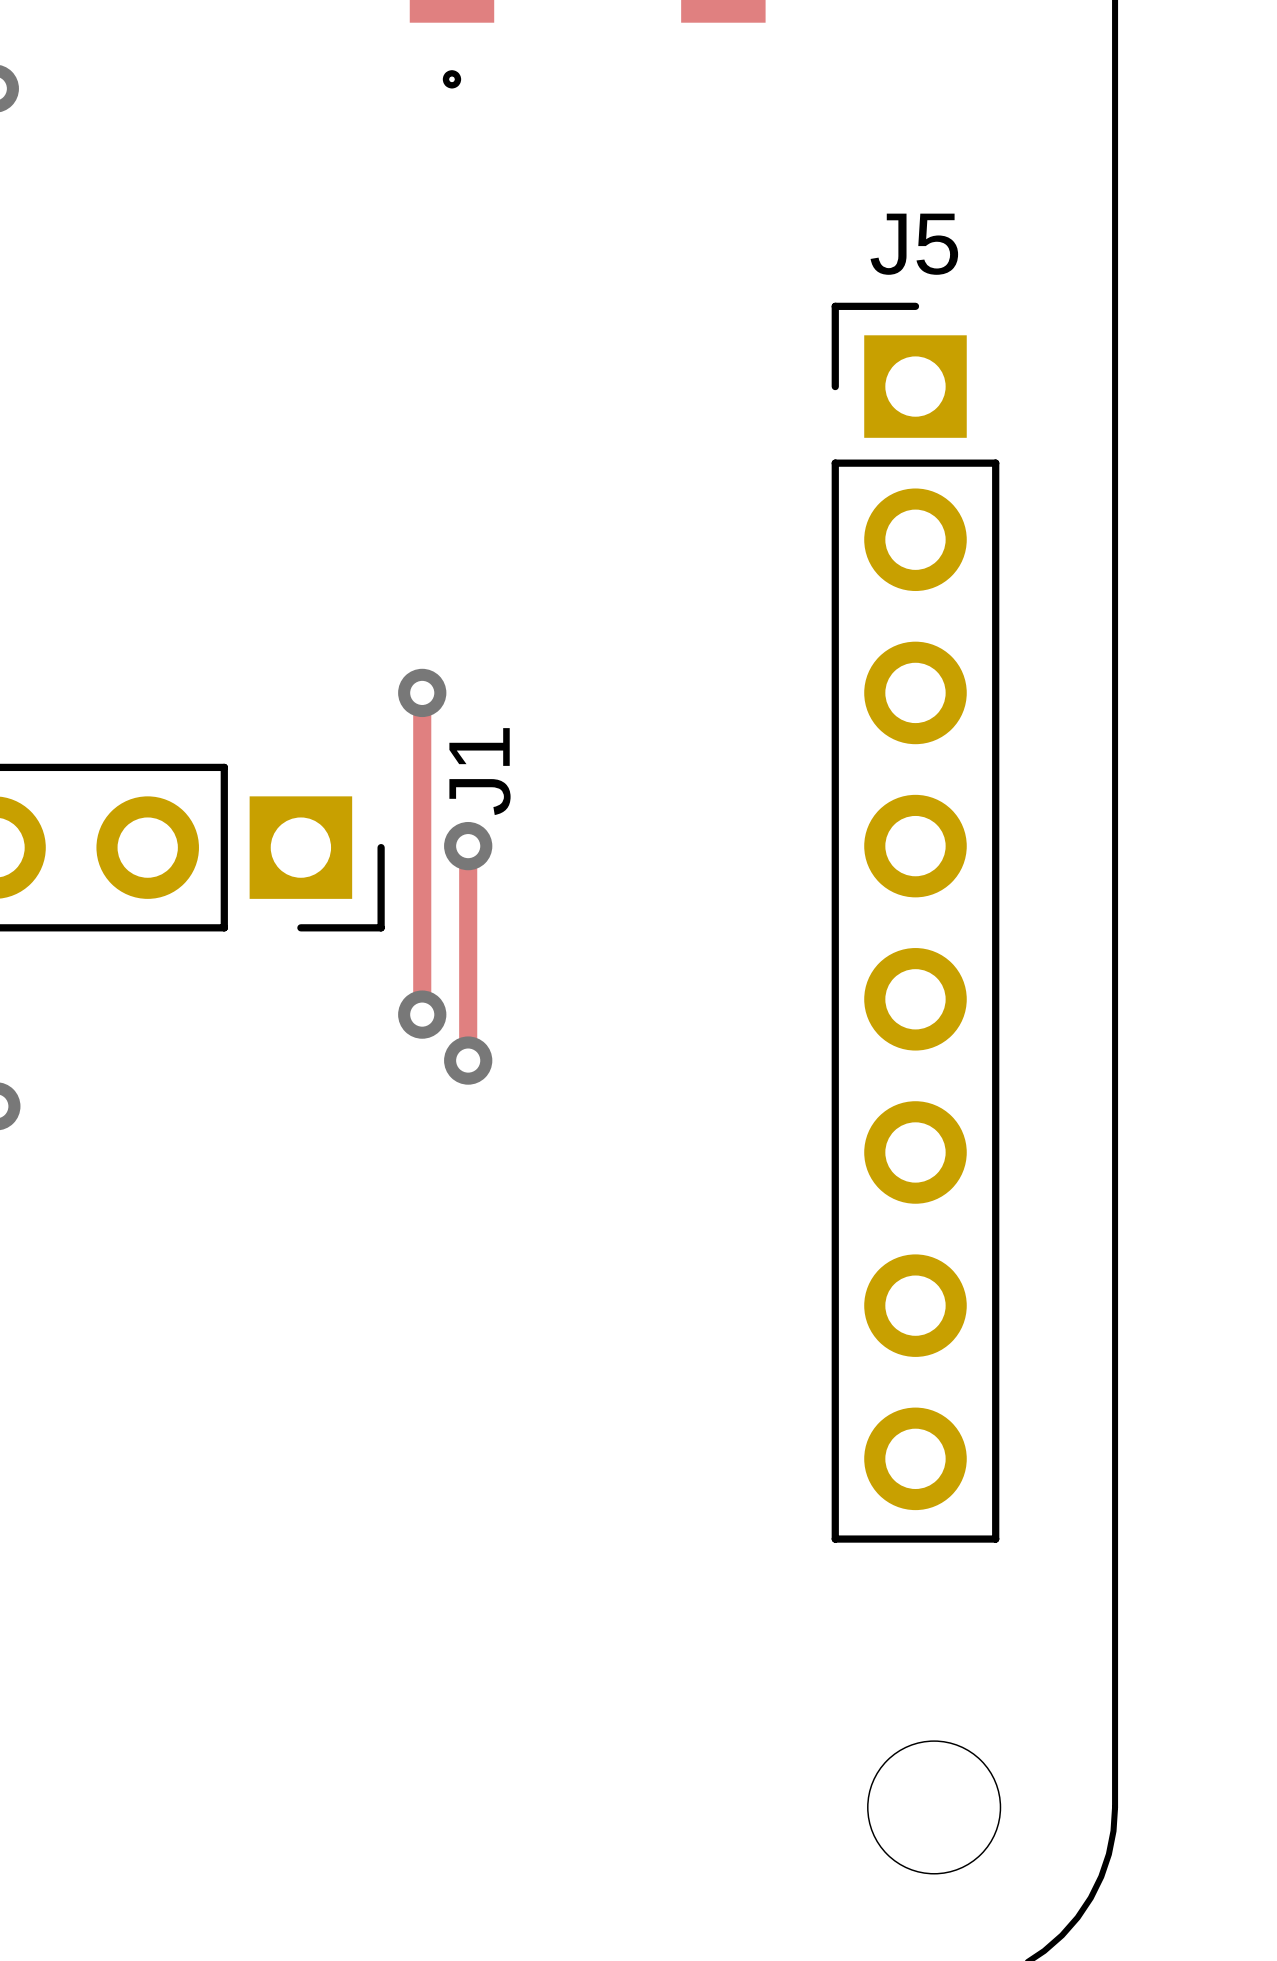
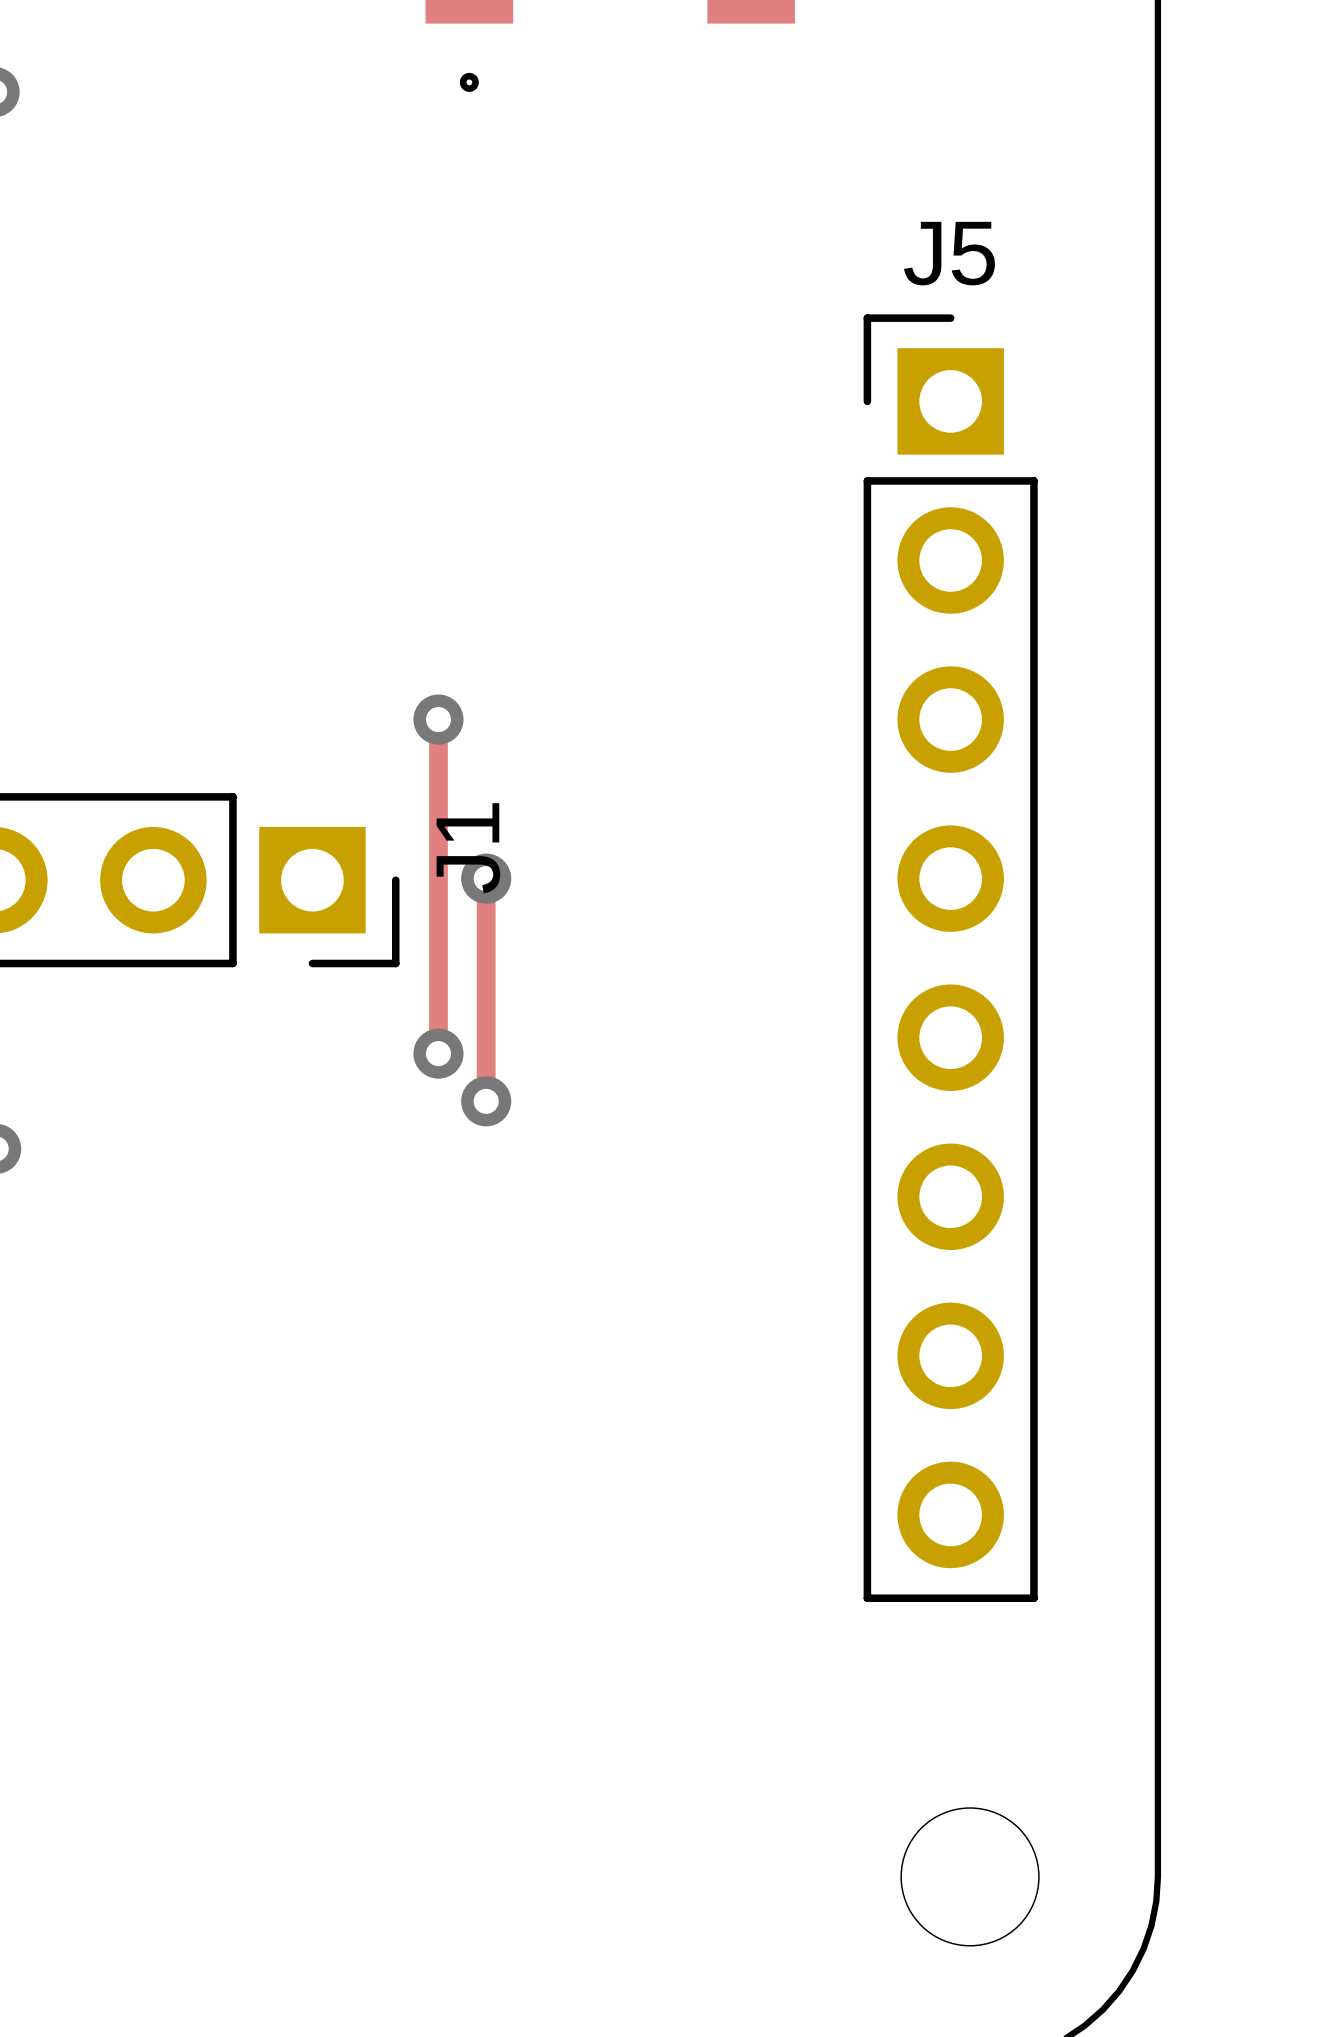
J1 name position: J1 (480, 771) -> J1 (468, 848)

